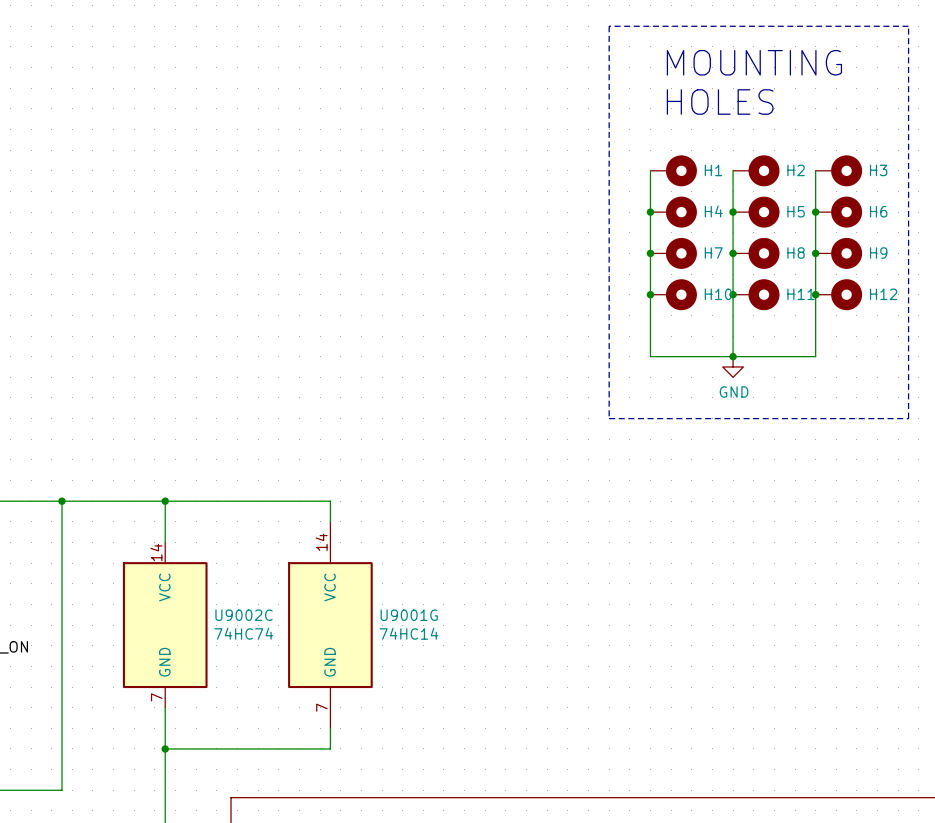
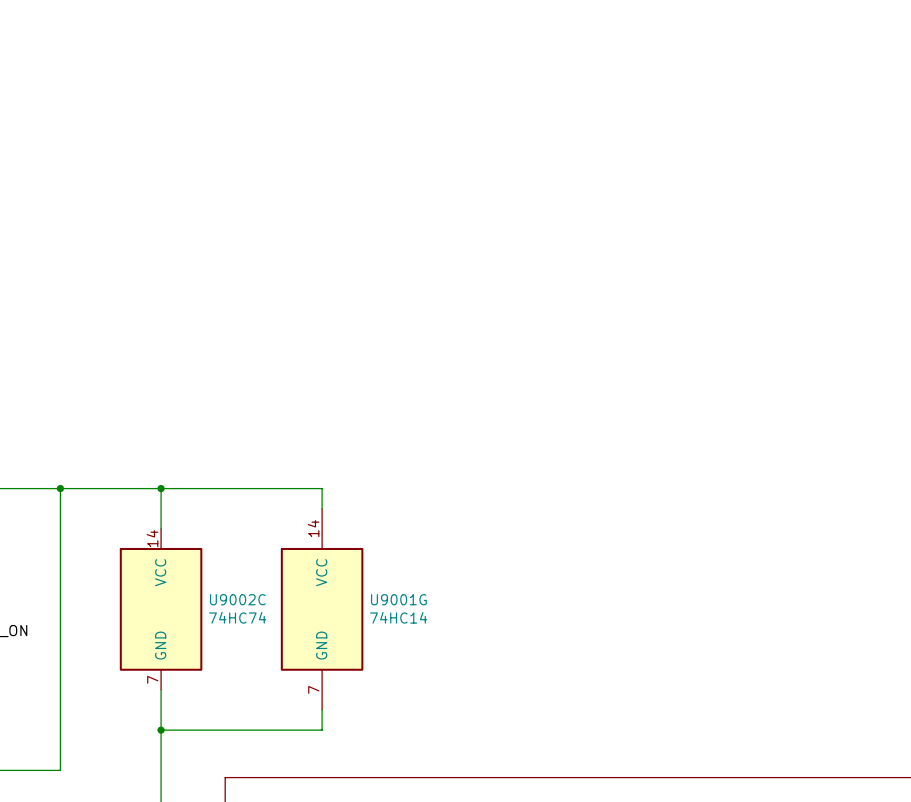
line: (609, 26) (609, 418) (908, 418) (908, 26) (609, 26) -> none
text: MOUNTING (754, 62) -> none
text: HOLES (720, 102) -> none
wire: (650, 170) (650, 356) (815, 356) (815, 170) -> none
H1: (673, 170) -> none
wire: (733, 170) (733, 356) -> none
H2: (756, 170) -> none
H3: (838, 170) -> none
junction: (650, 212) -> none
H4: (673, 212) -> none
junction: (733, 212) -> none
H5: (756, 212) -> none
junction: (815, 212) -> none
H6: (838, 212) -> none
junction: (650, 253) -> none
H7: (673, 253) -> none
junction: (733, 253) -> none
H8: (756, 253) -> none
junction: (815, 253) -> none
H9: (838, 253) -> none
junction: (650, 294) -> none
H10: (673, 294) -> none
junction: (733, 294) -> none
H11: (756, 294) -> none
junction: (815, 294) -> none
H12: (838, 294) -> none
junction: (733, 356) -> none
power symbol: GND (733, 366) -> none

